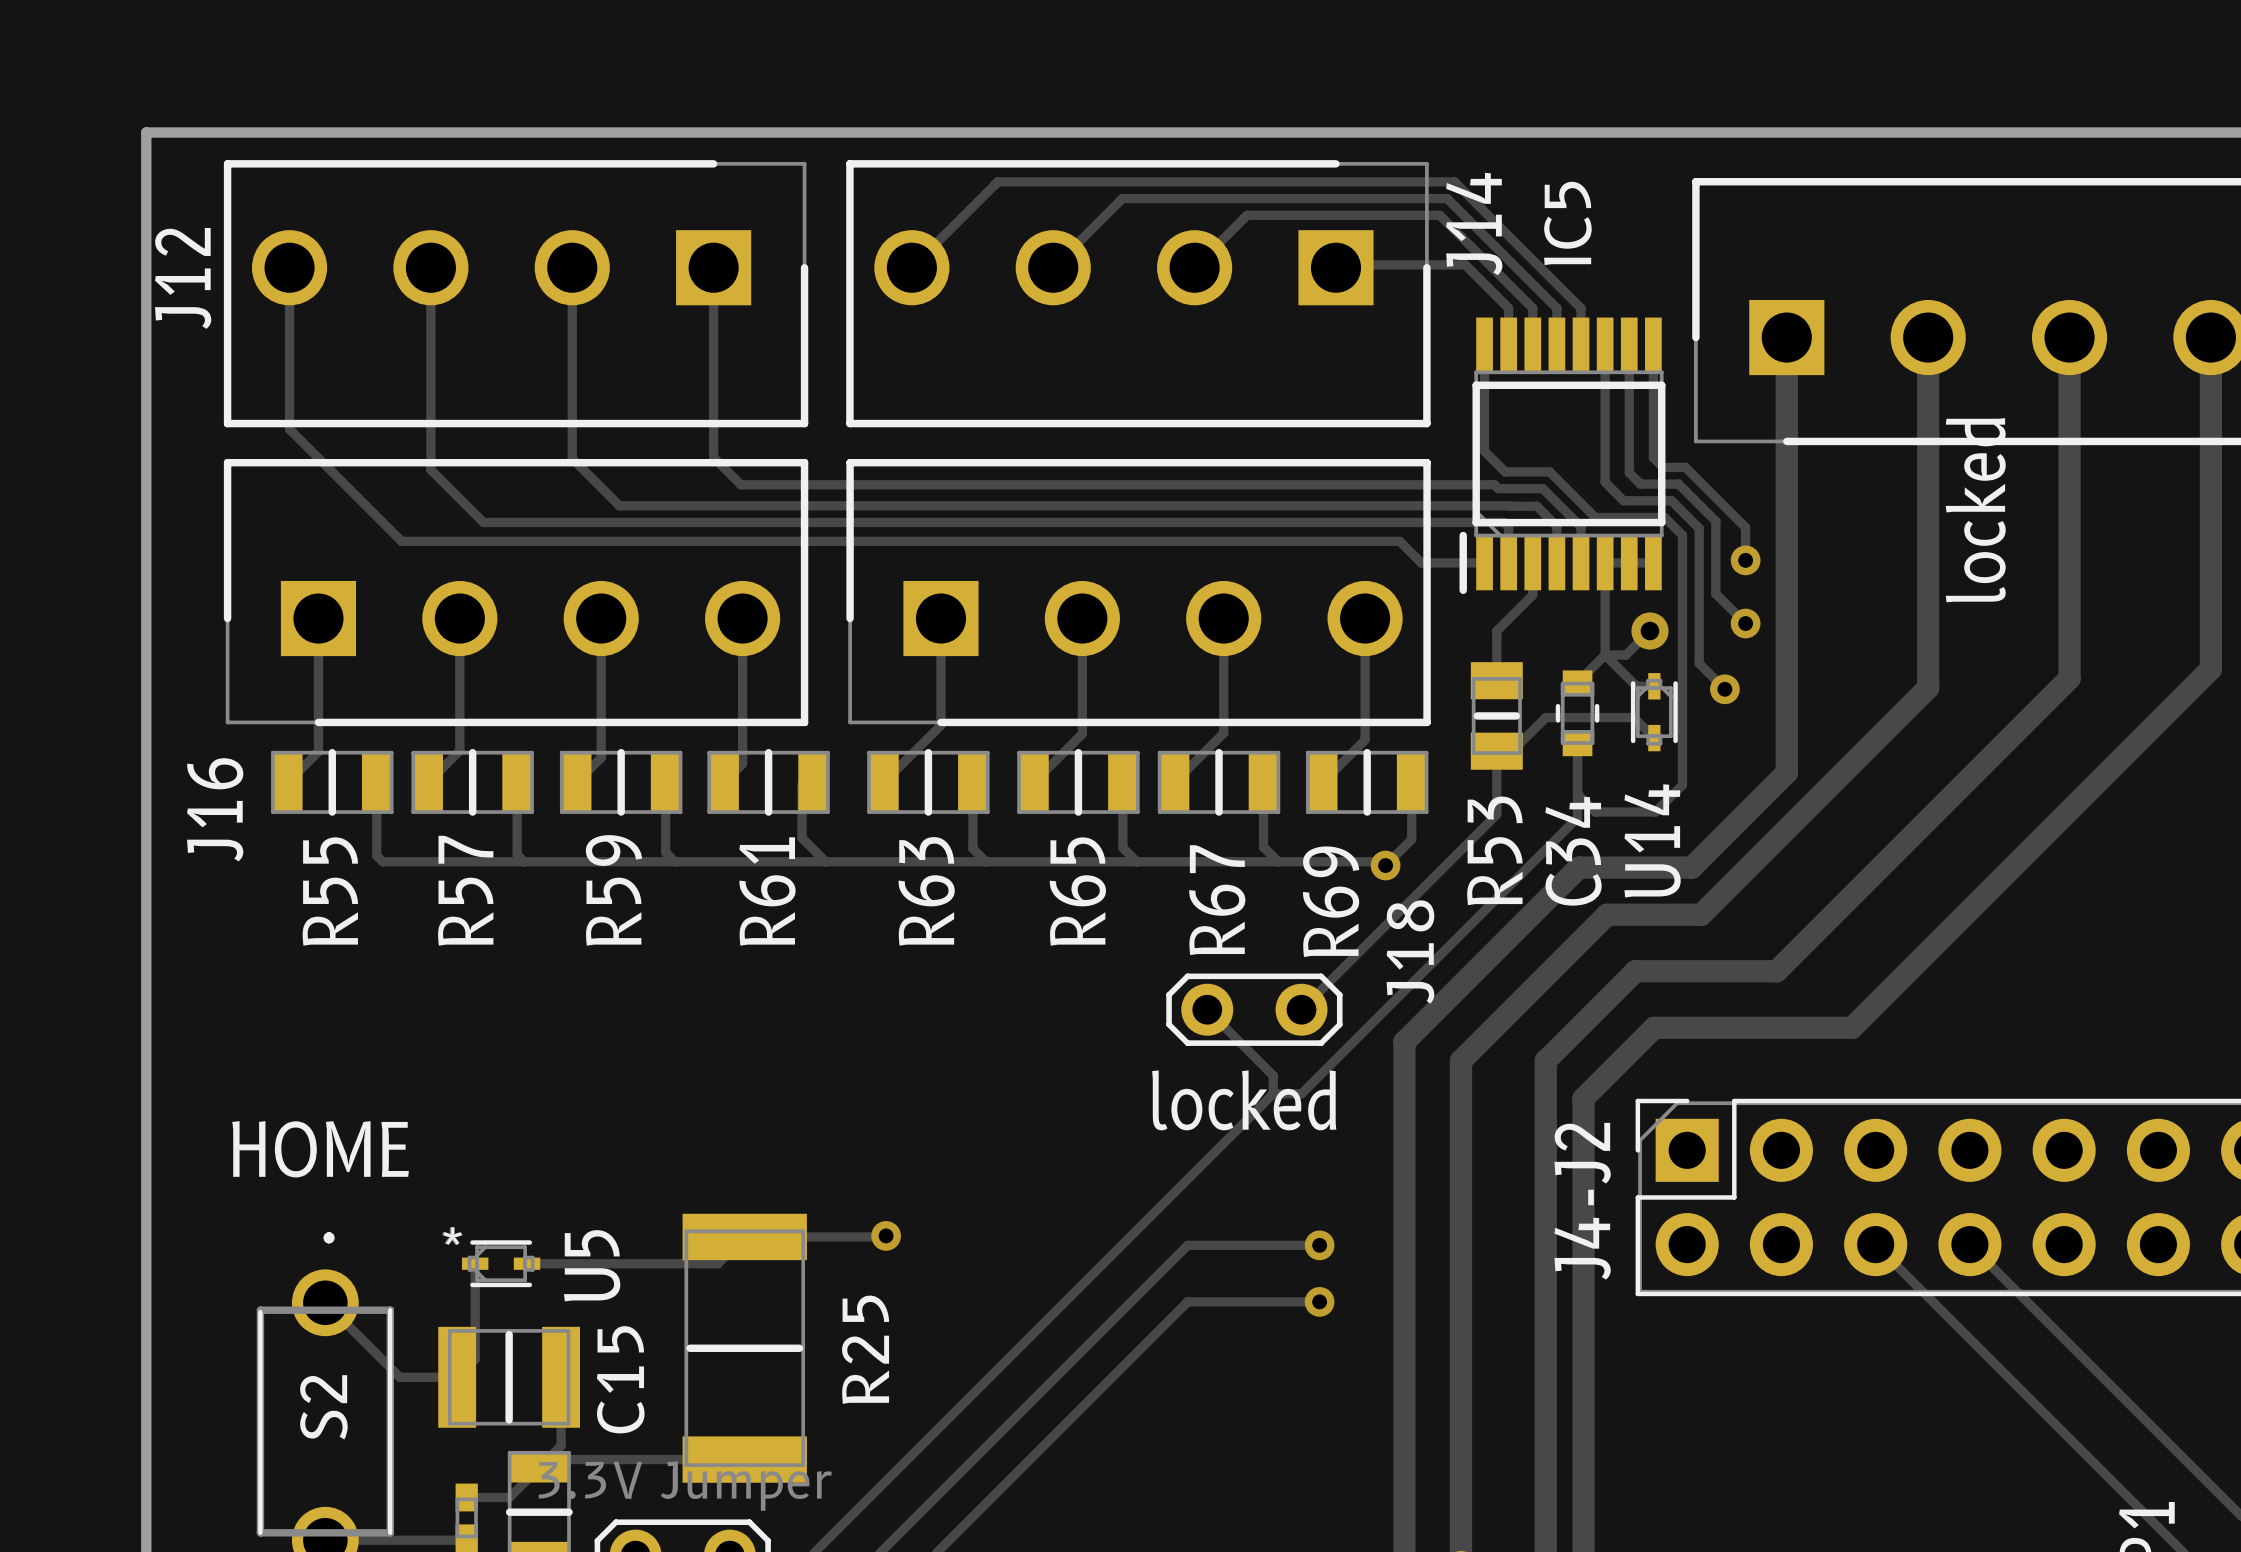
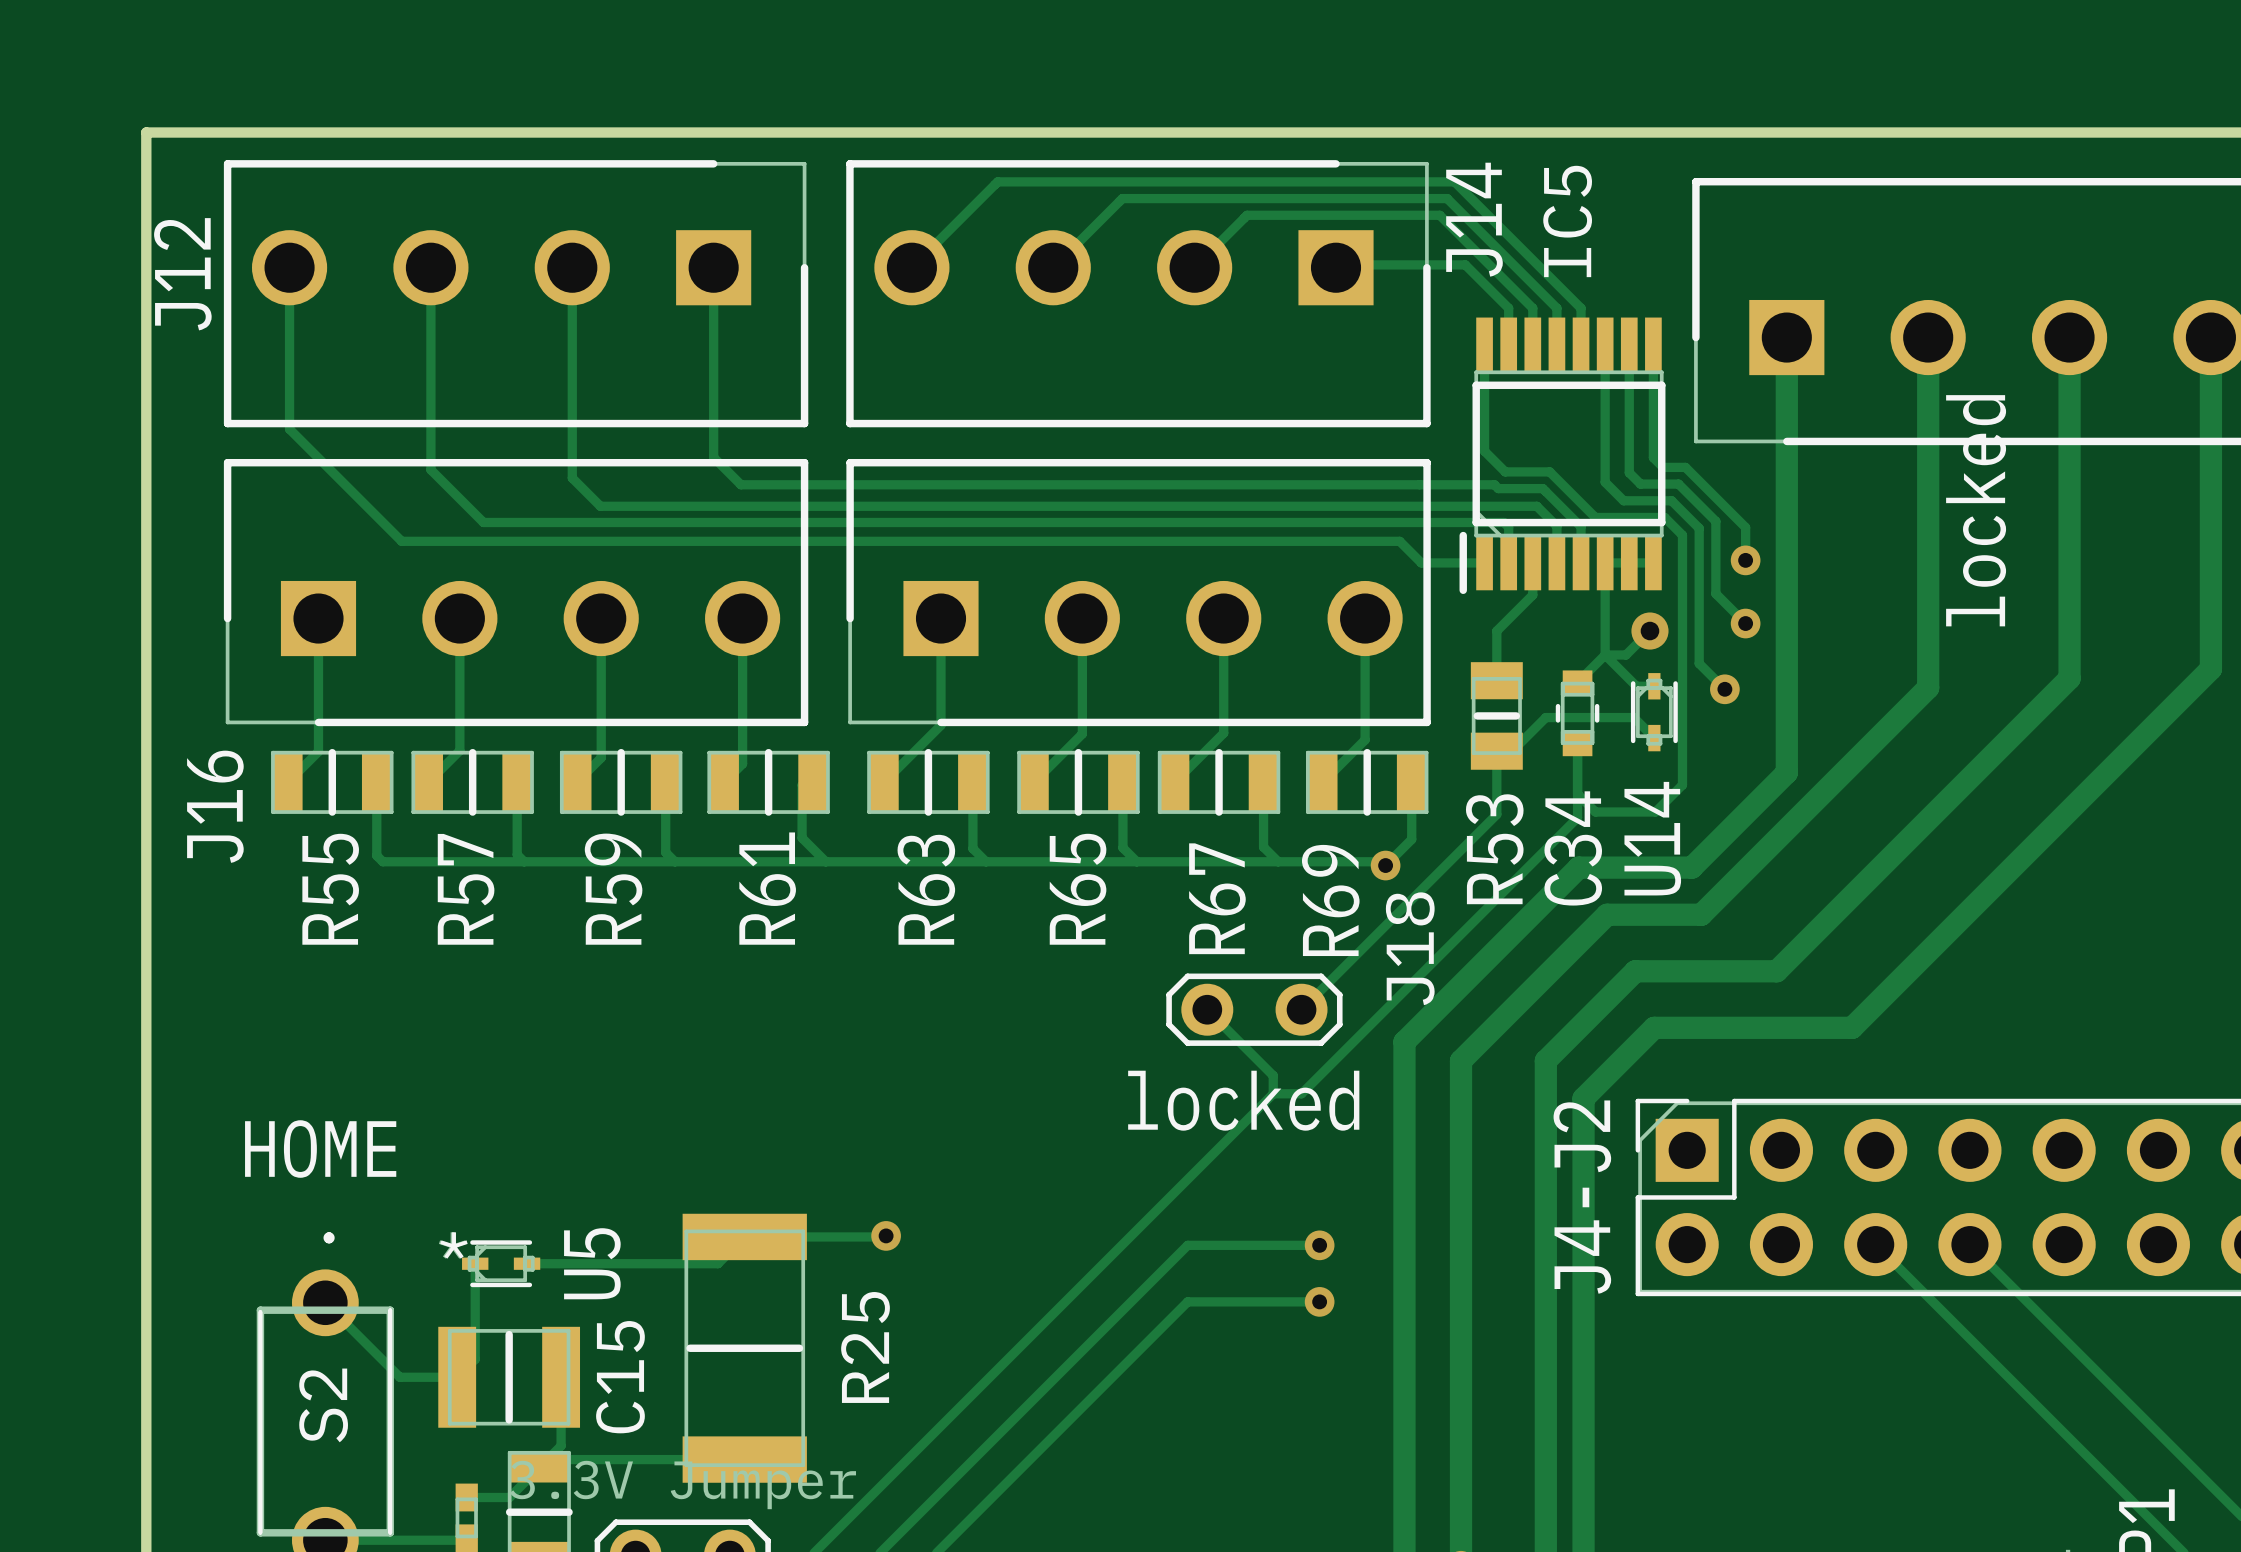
track: (572, 458) (619, 505) (1510, 505) -> (572, 458) (572, 478) (600, 506) (1511, 506)

